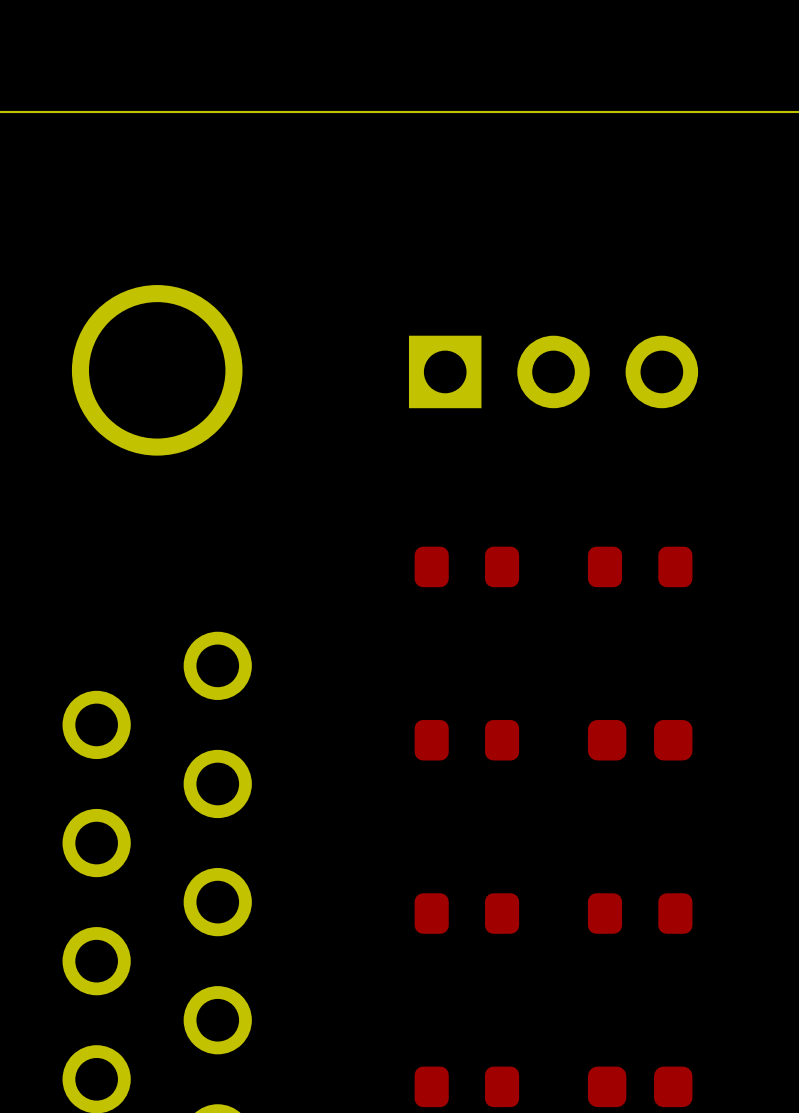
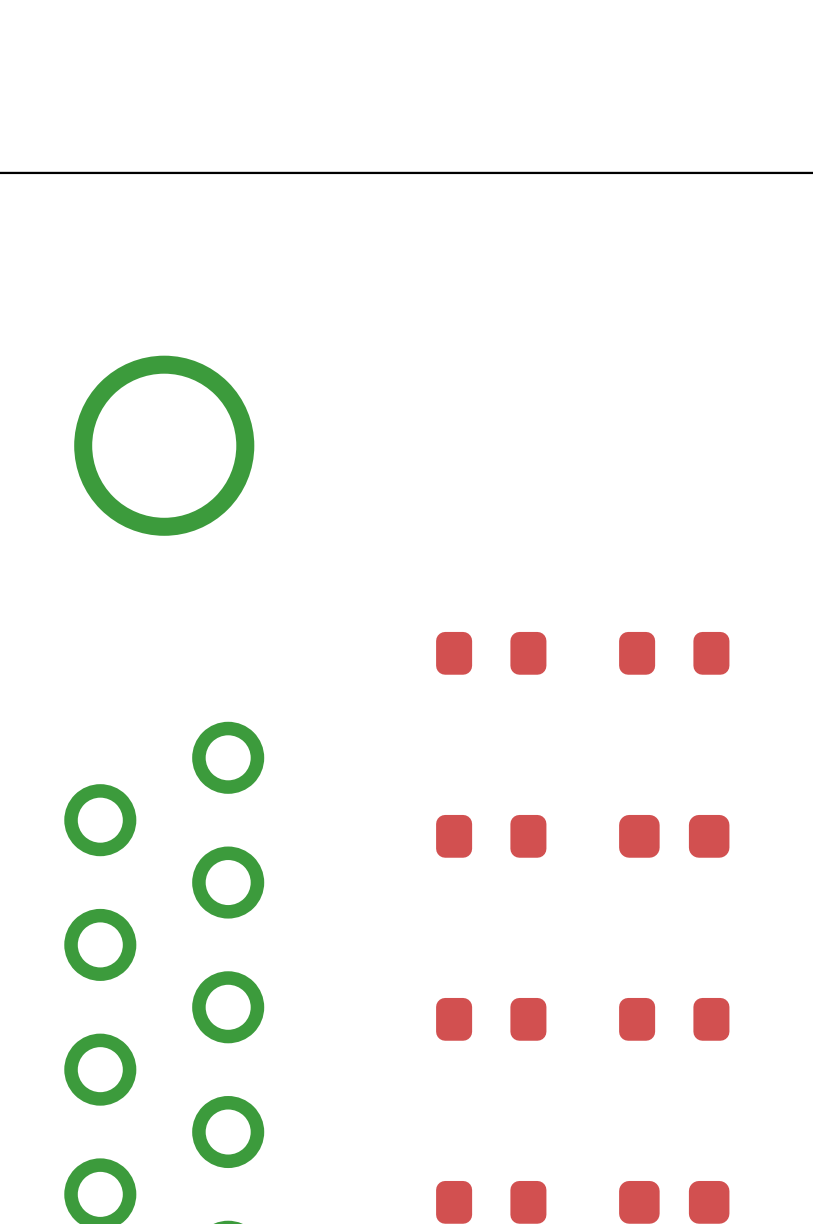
part: (553, 371) -> none

